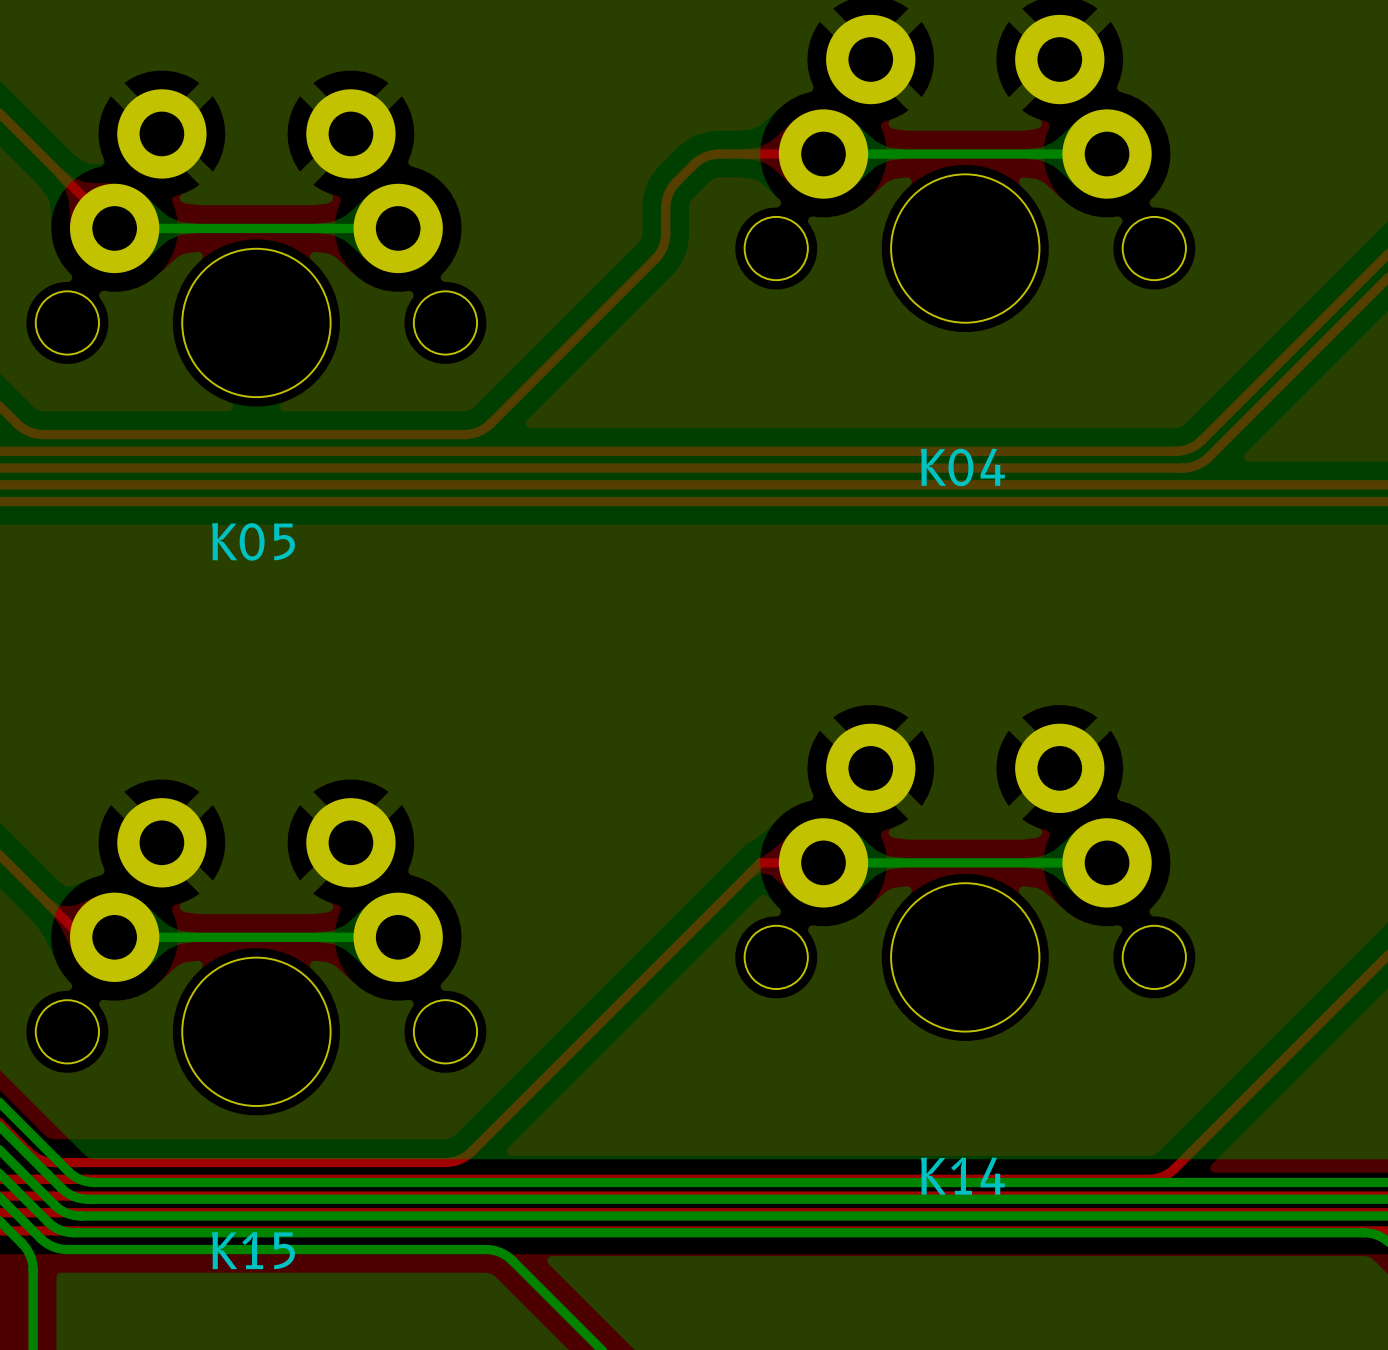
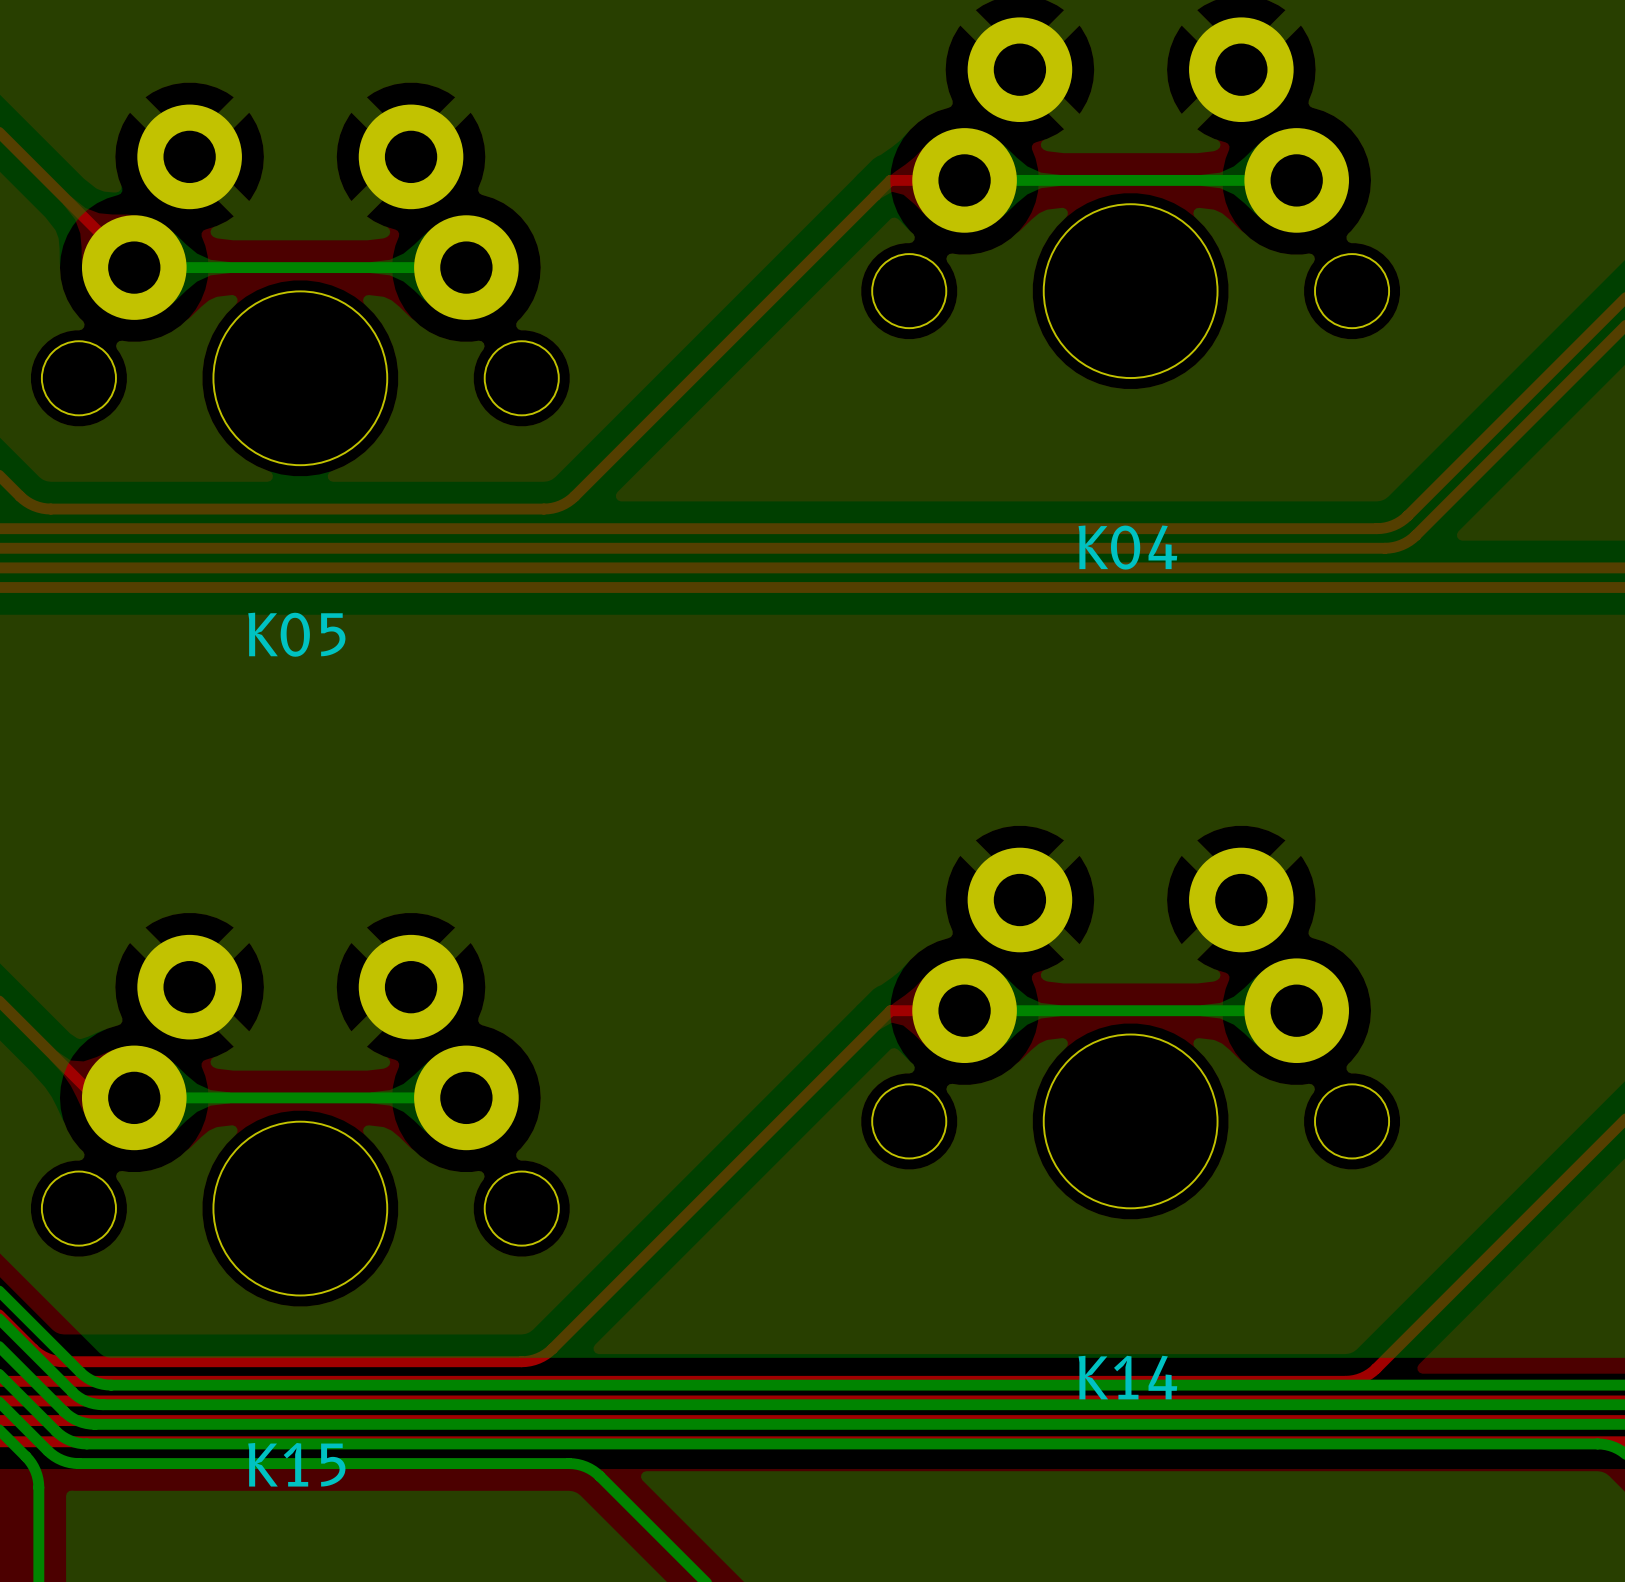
top track: (760, 154) (709, 155) (696, 162) (676, 181) (670, 190) (666, 200) (664, 244) (654, 259) -> (890, 180) (767, 304)

